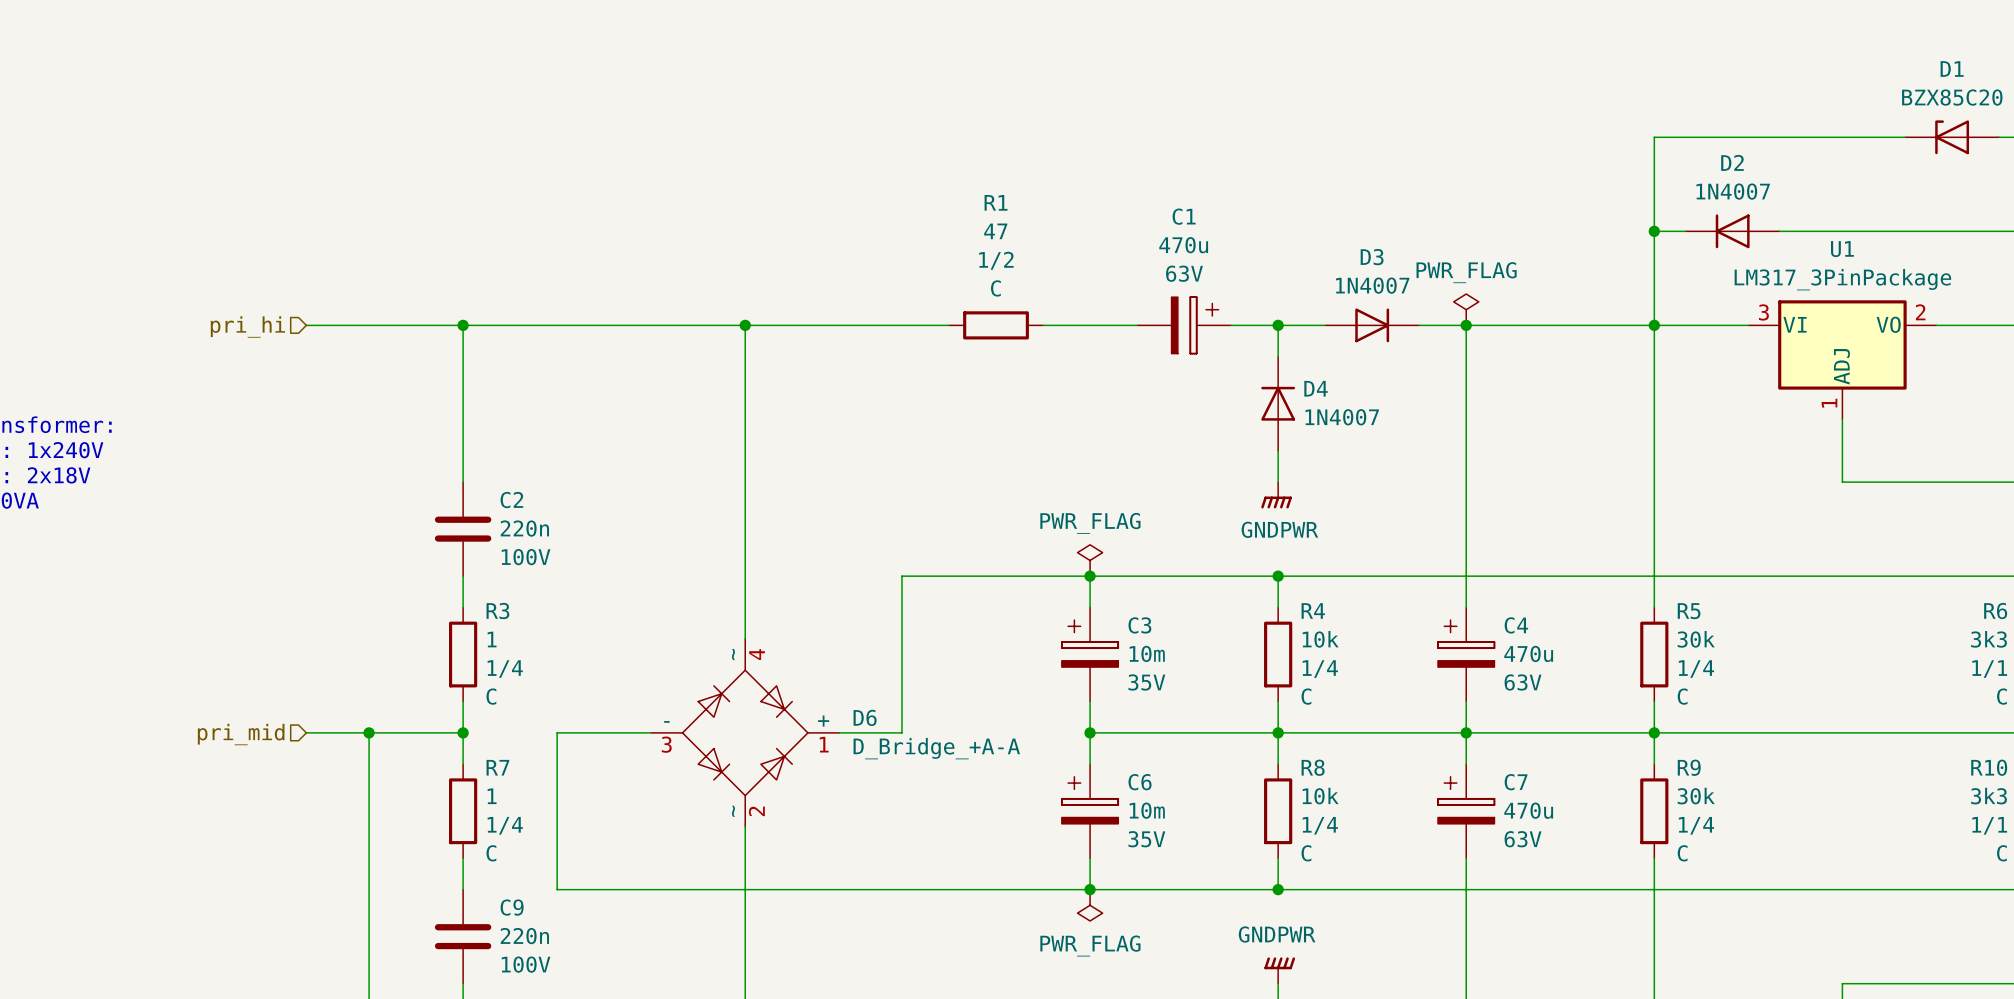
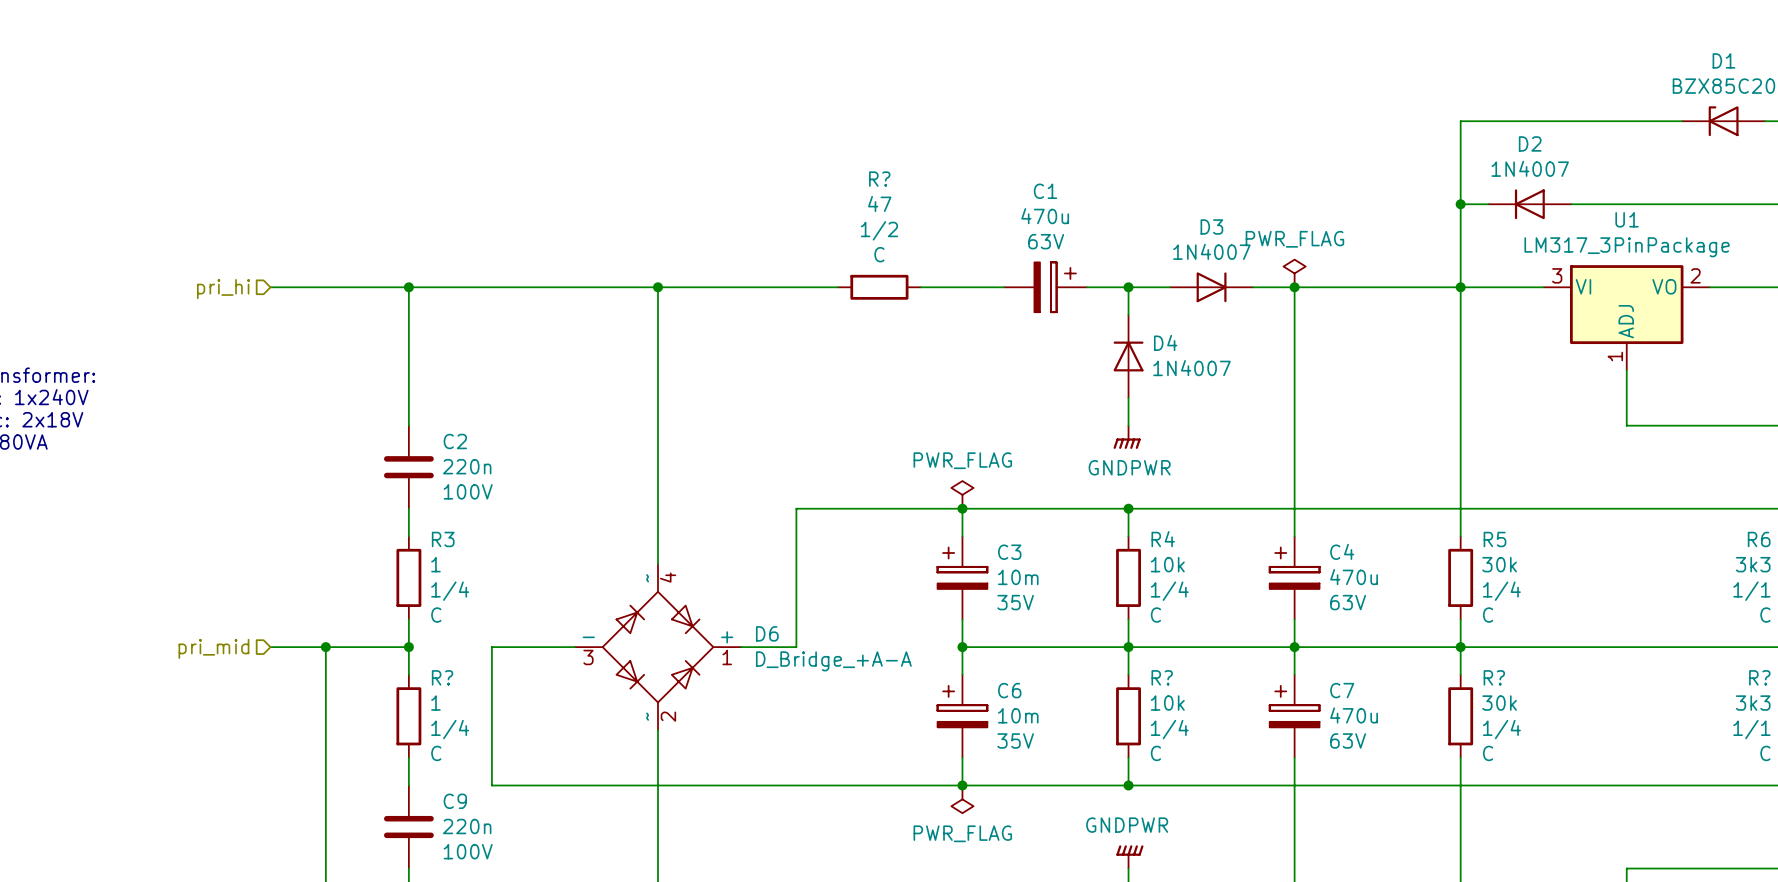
R1 name: R1 (996, 202) -> R? (879, 179)
R7 name: R7 (497, 767) -> R? (442, 677)
R8 name: R8 (1313, 767) -> R? (1162, 677)
R9 name: R9 (1689, 767) -> R? (1494, 677)
R10 name: R10 (1989, 767) -> R? (1759, 677)

